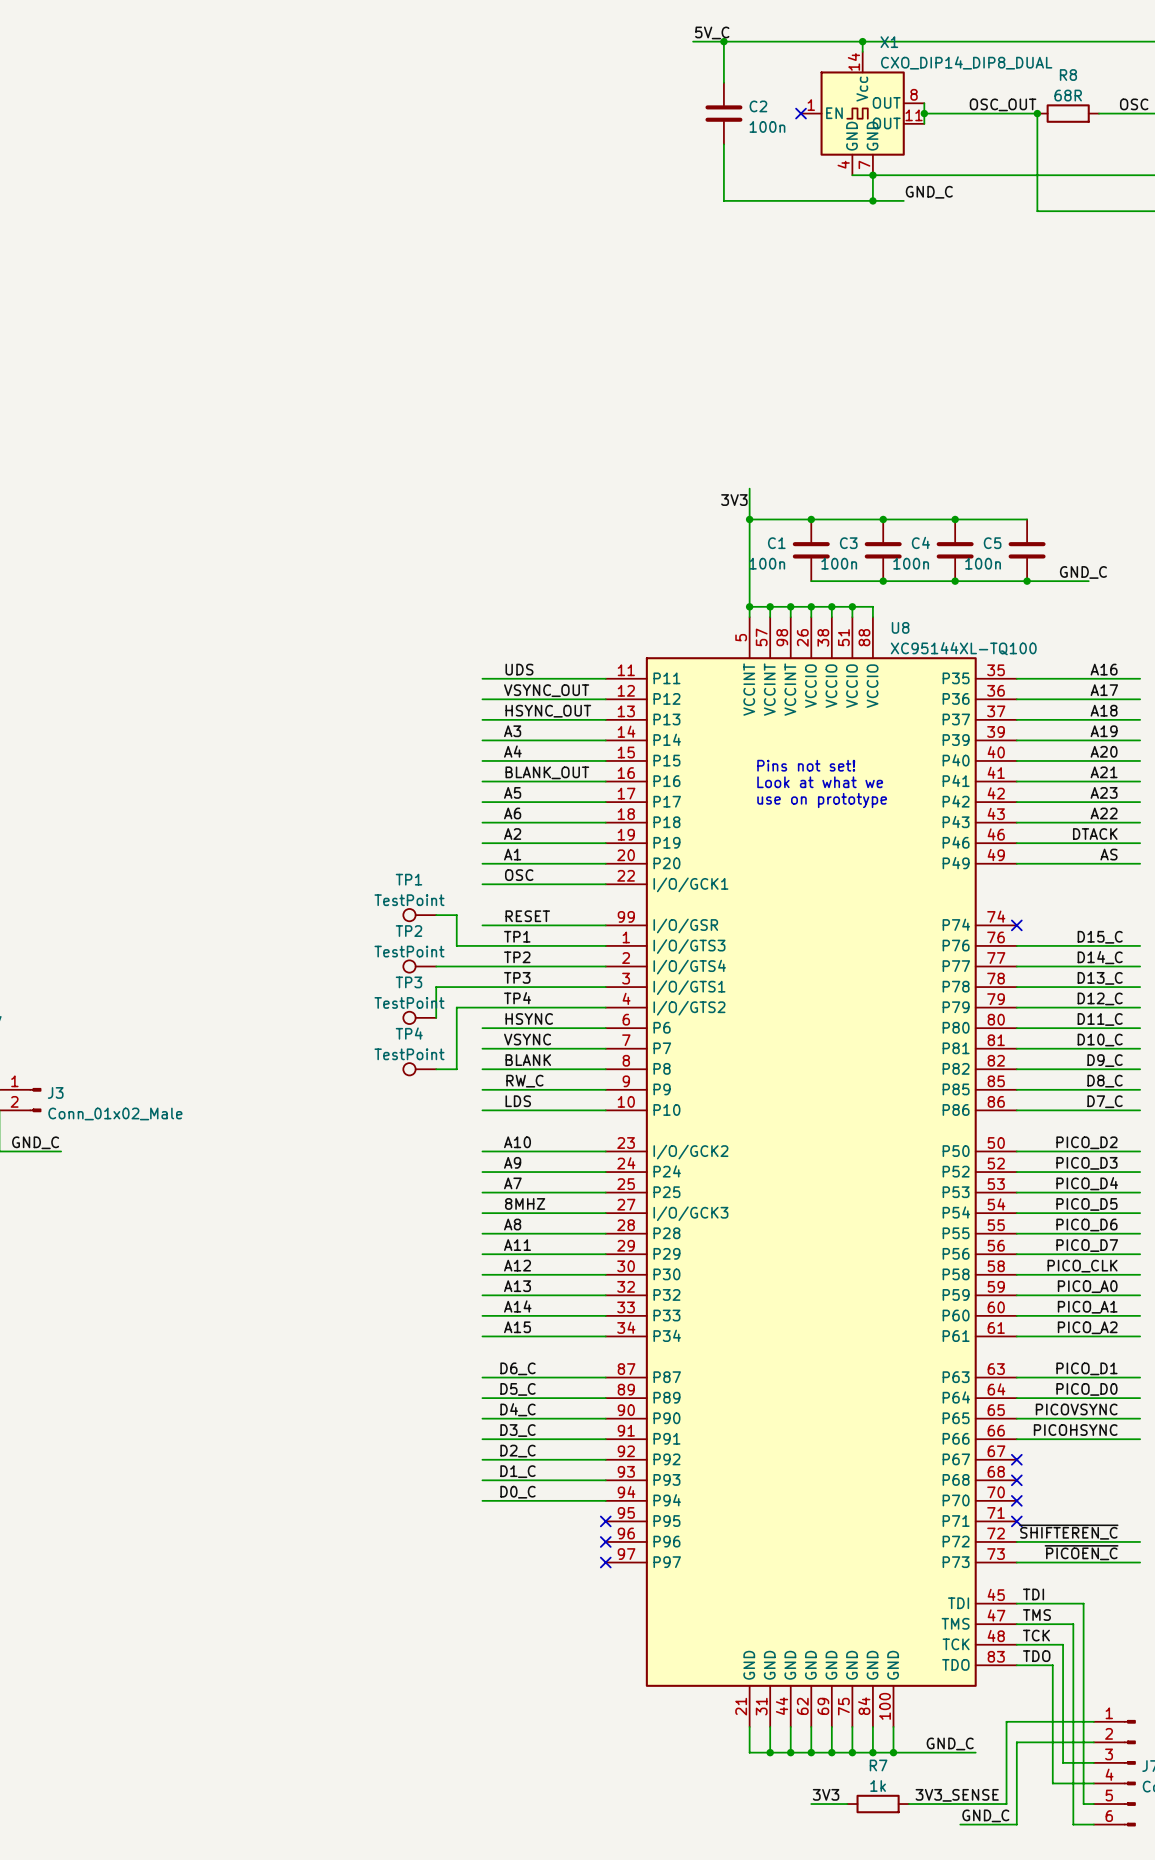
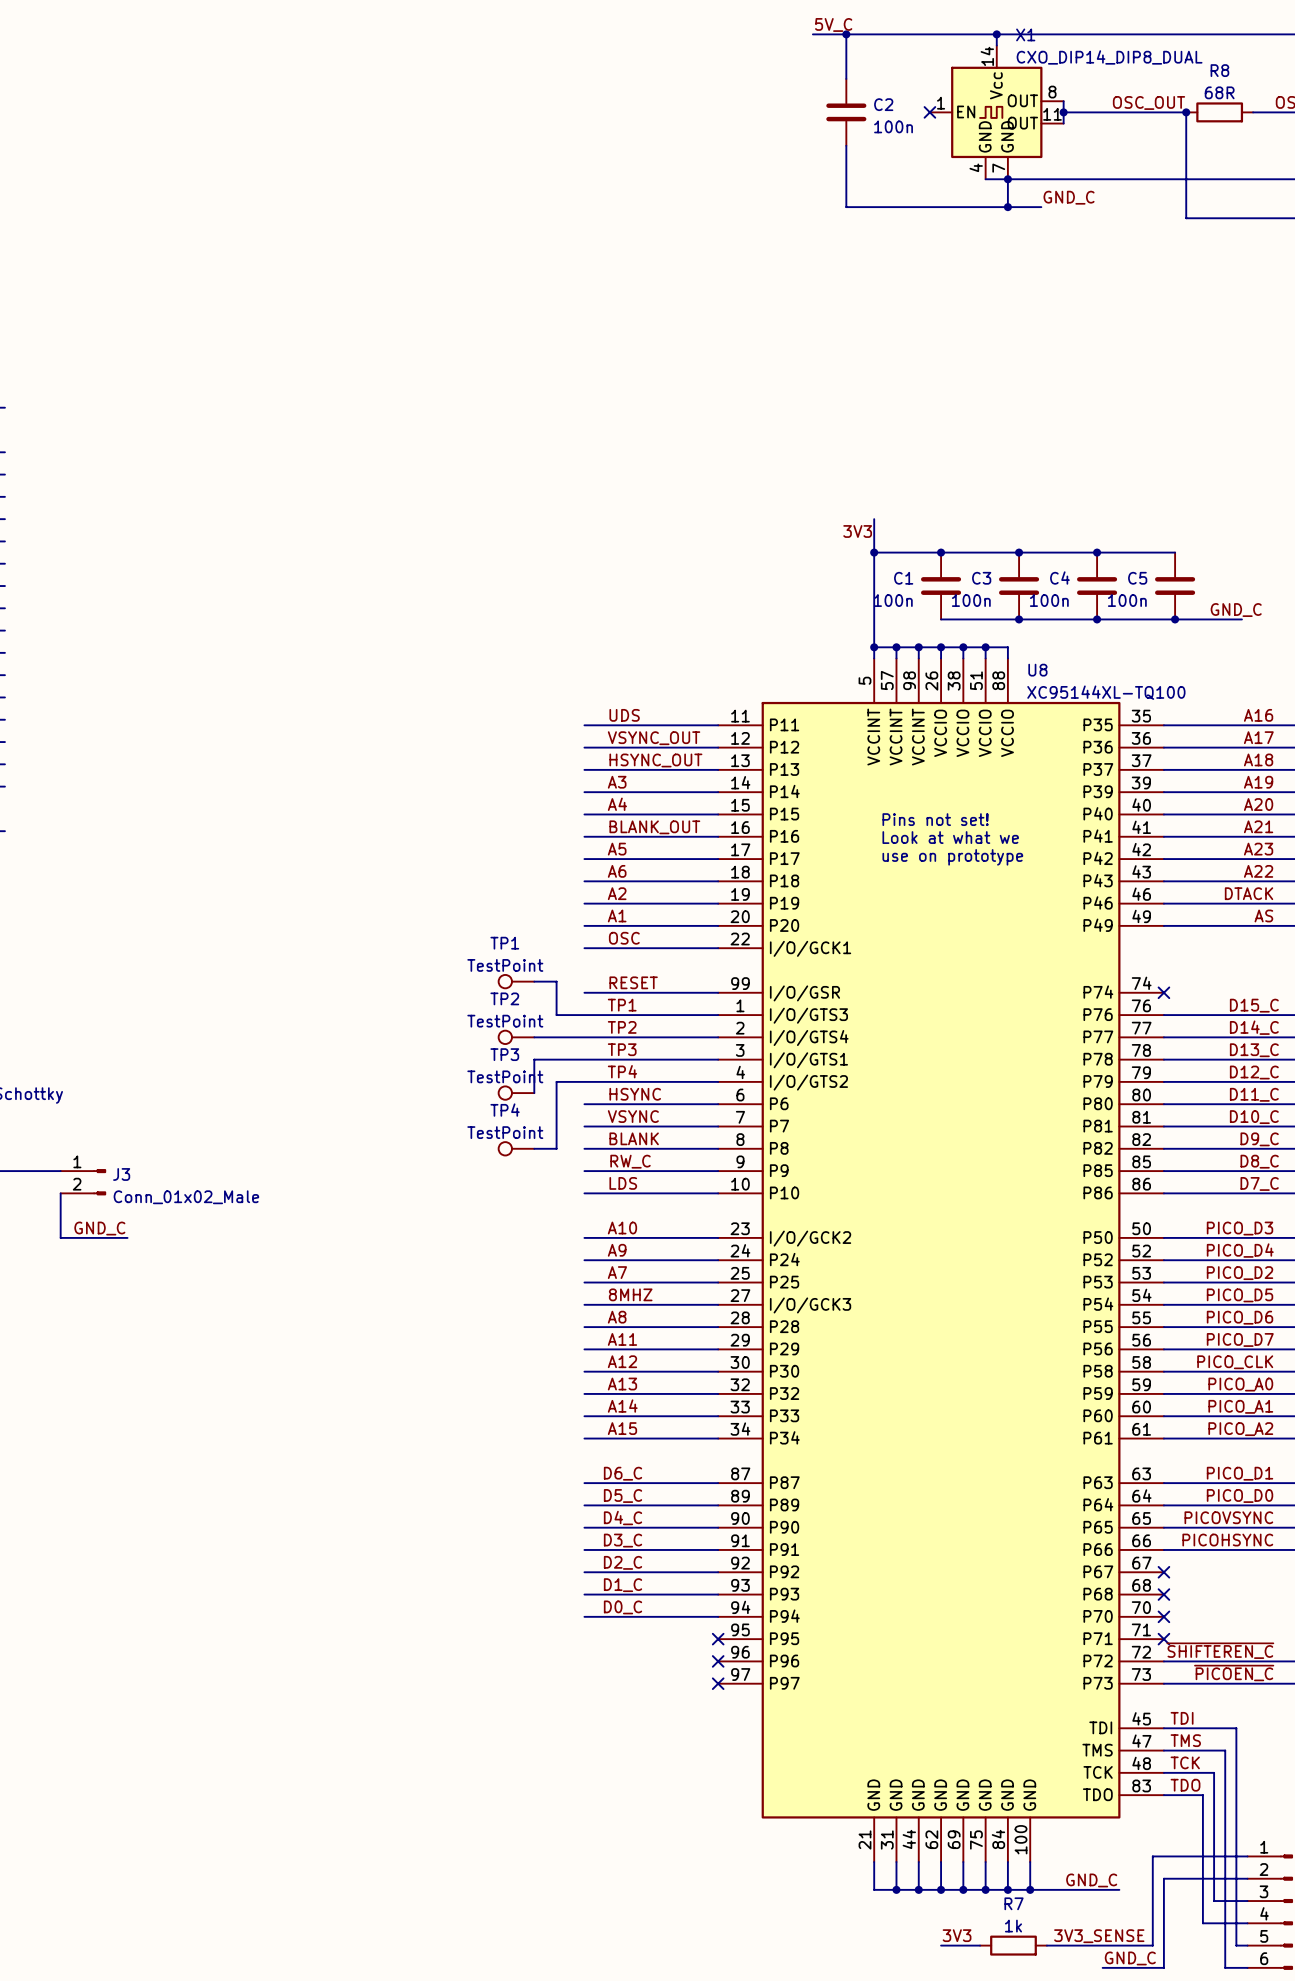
label: PICO_D2 (1086, 1142) -> PICO_D3 (1240, 1228)
label: PICO_D3 (1086, 1163) -> PICO_D4 (1240, 1250)
label: PICO_D4 (1087, 1183) -> PICO_D2 (1240, 1273)

